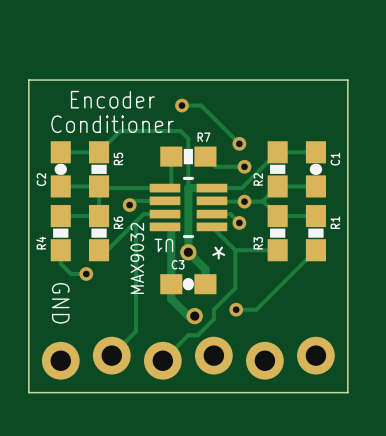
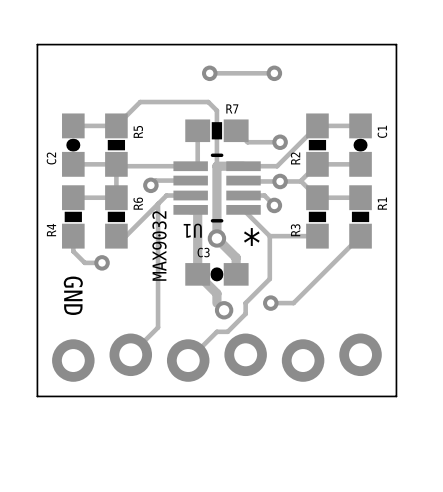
text: Encoder (112, 99) -> none
track: (201, 105) (239, 143) -> (231, 73) (274, 73)
text: Conditioner (112, 124) -> none
via position: (239, 143) -> (274, 73)
track: none -> (197, 274) (216, 293) (216, 303)
track: (169, 290) (171, 284) (171, 299) (188, 316) (194, 316) -> none

